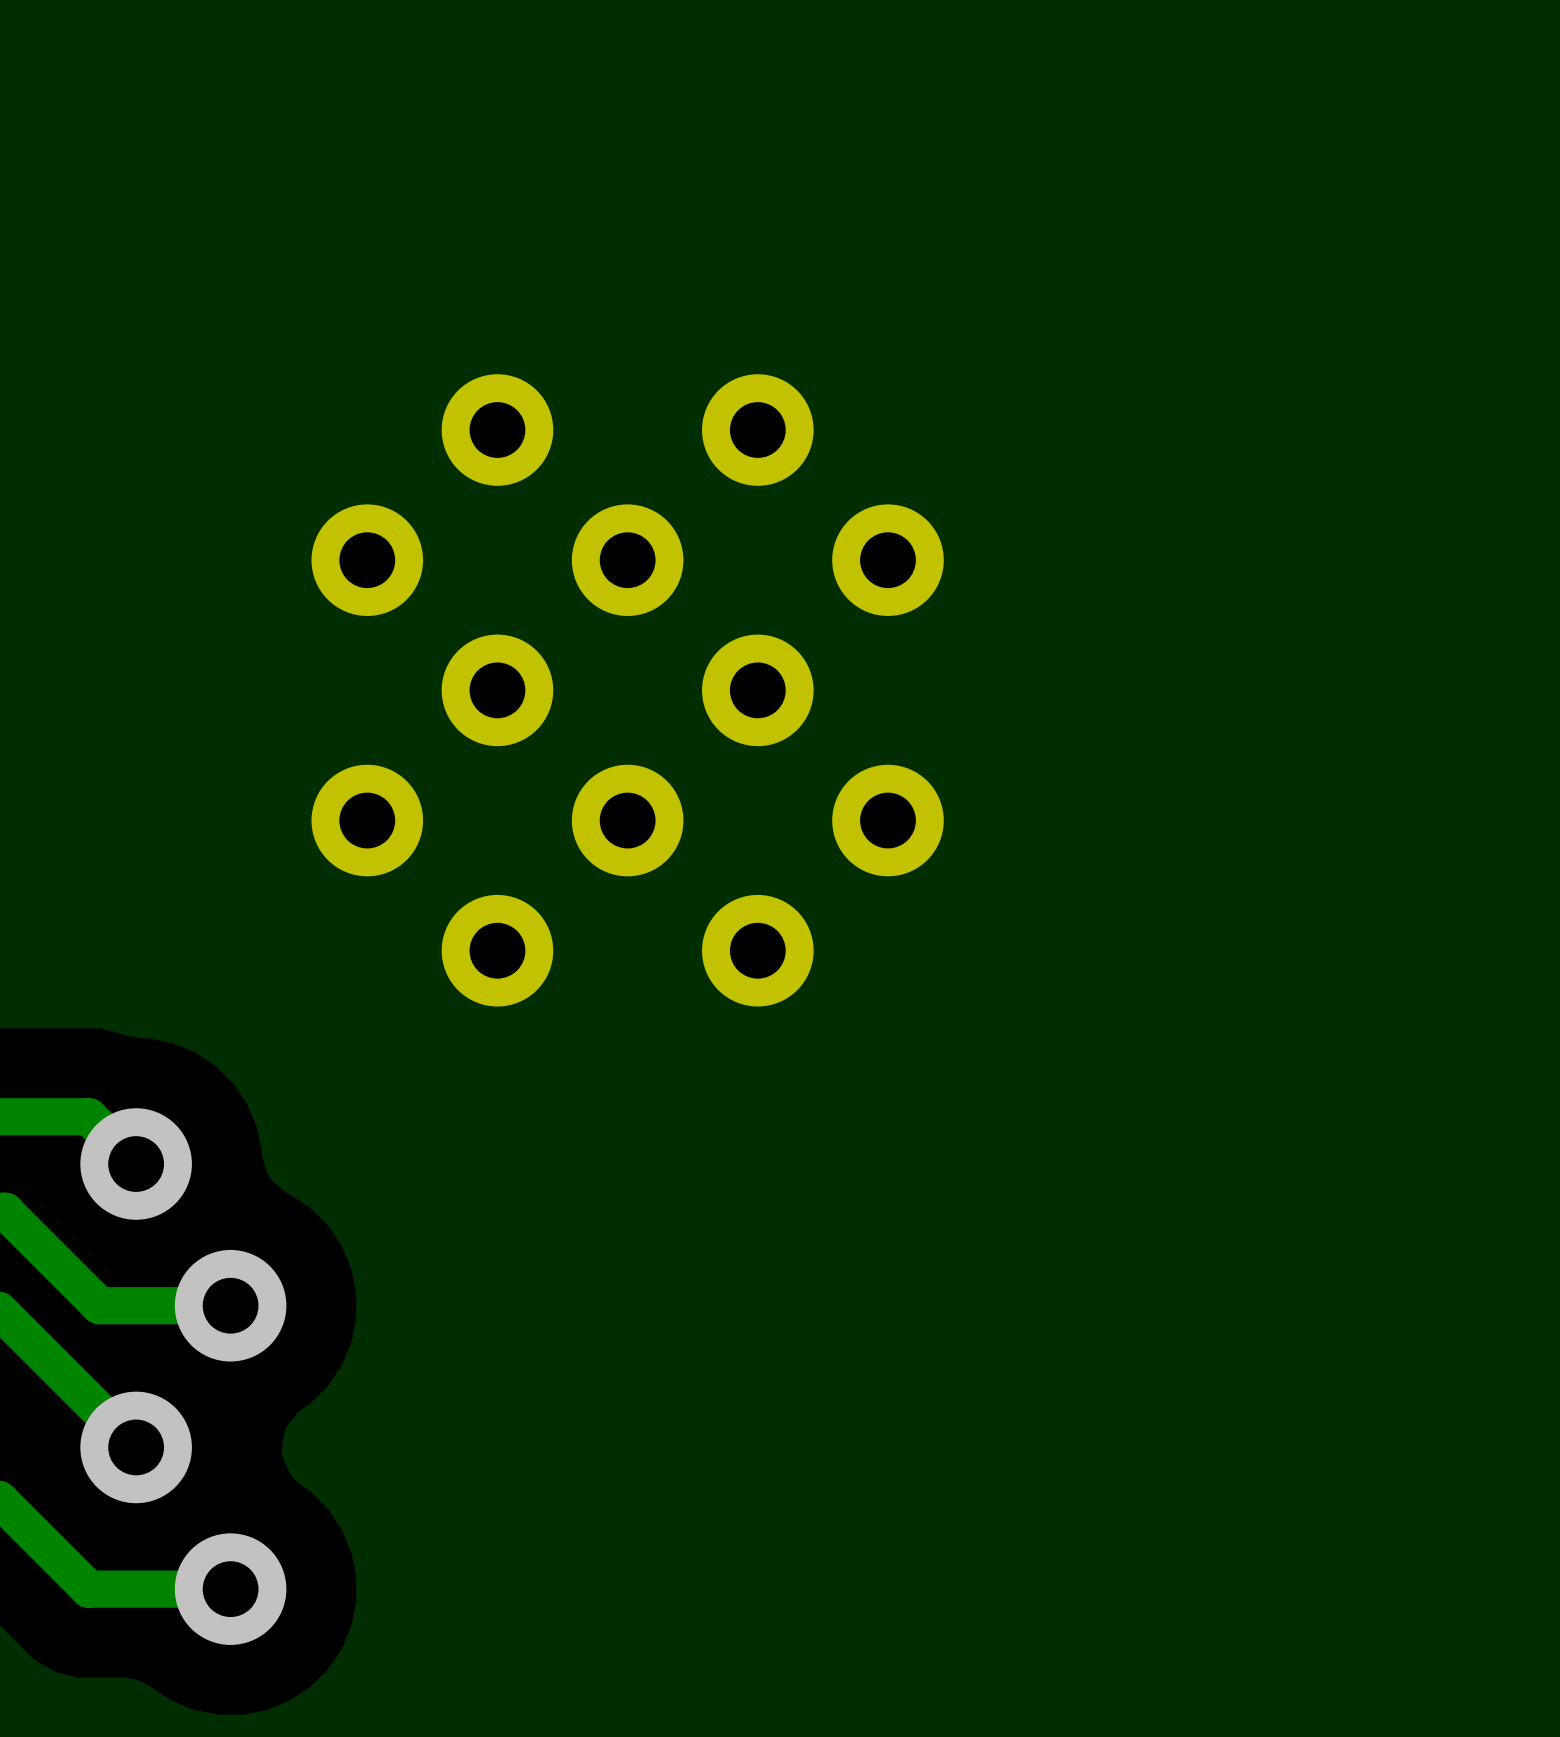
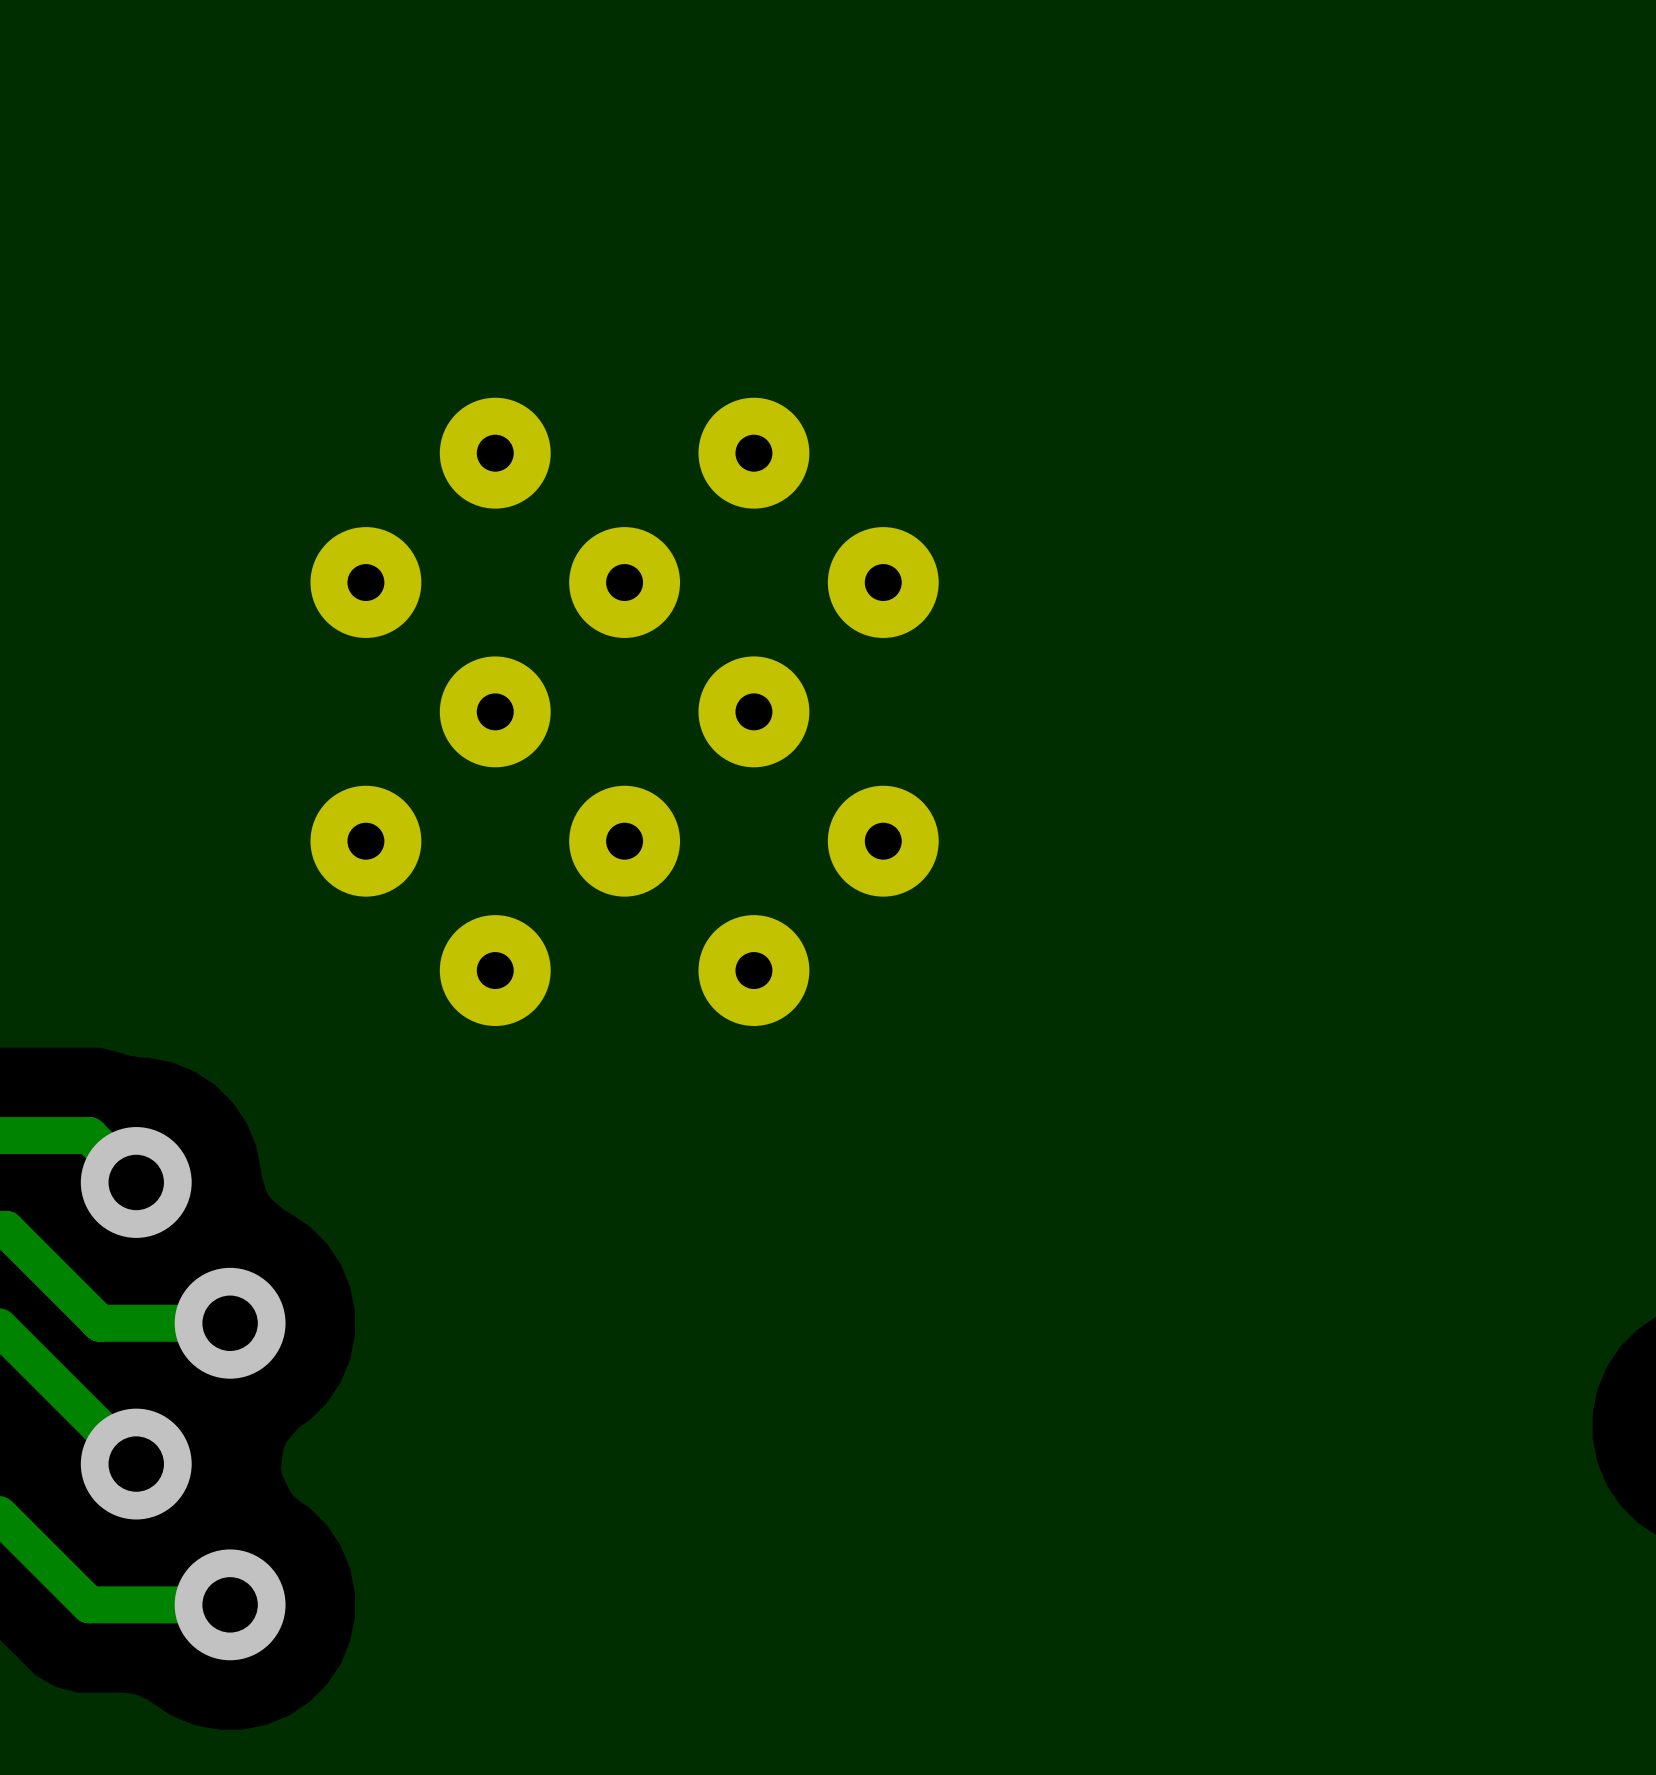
part footprint: [311, 374, 944, 1007] -> [310, 397, 939, 1026]

